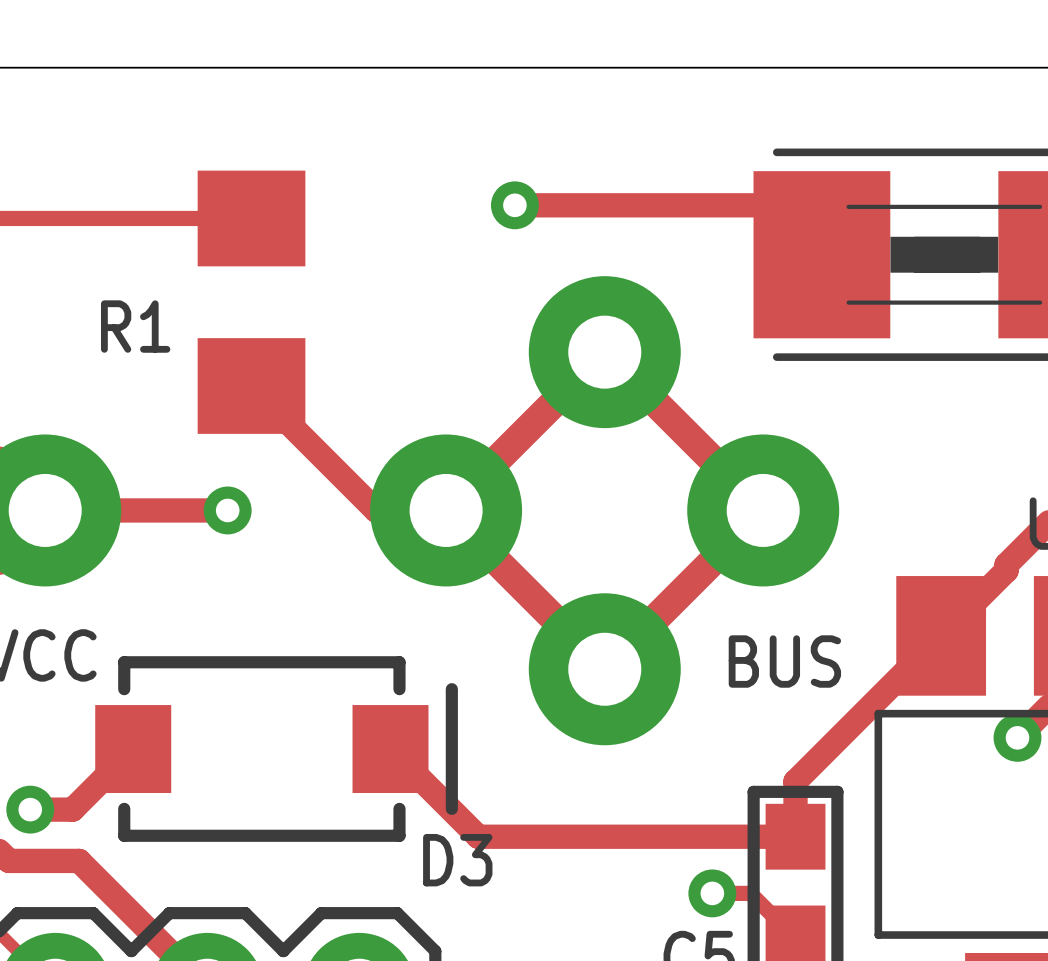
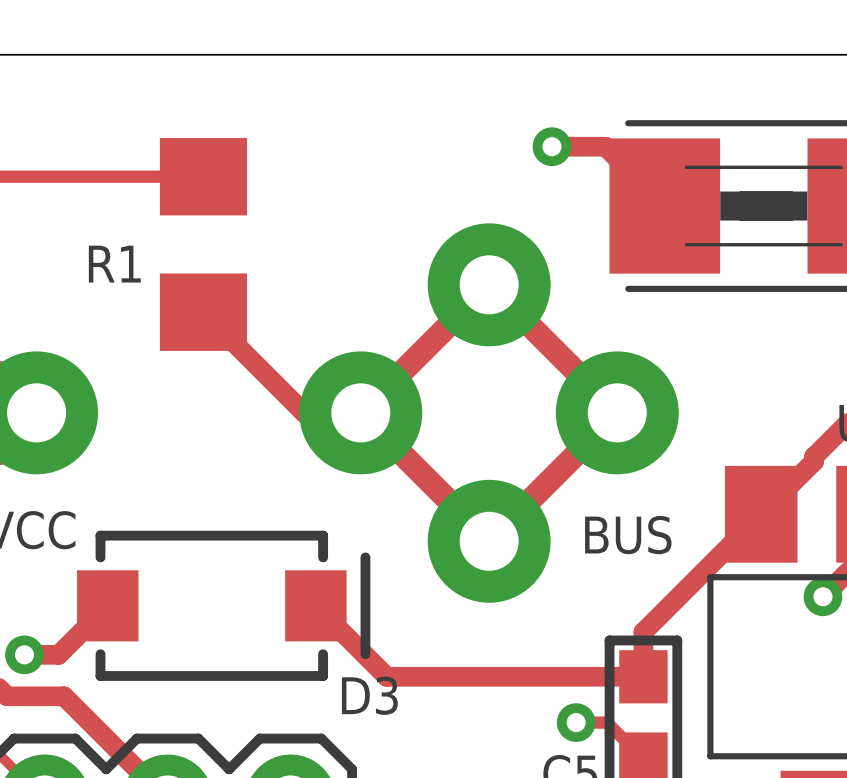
track: (514, 205) (772, 205) -> (551, 146) (605, 146) (624, 166)
via position: (514, 205) -> (551, 146)
track: (45, 510) (227, 510) -> none
via: (227, 510) -> none

